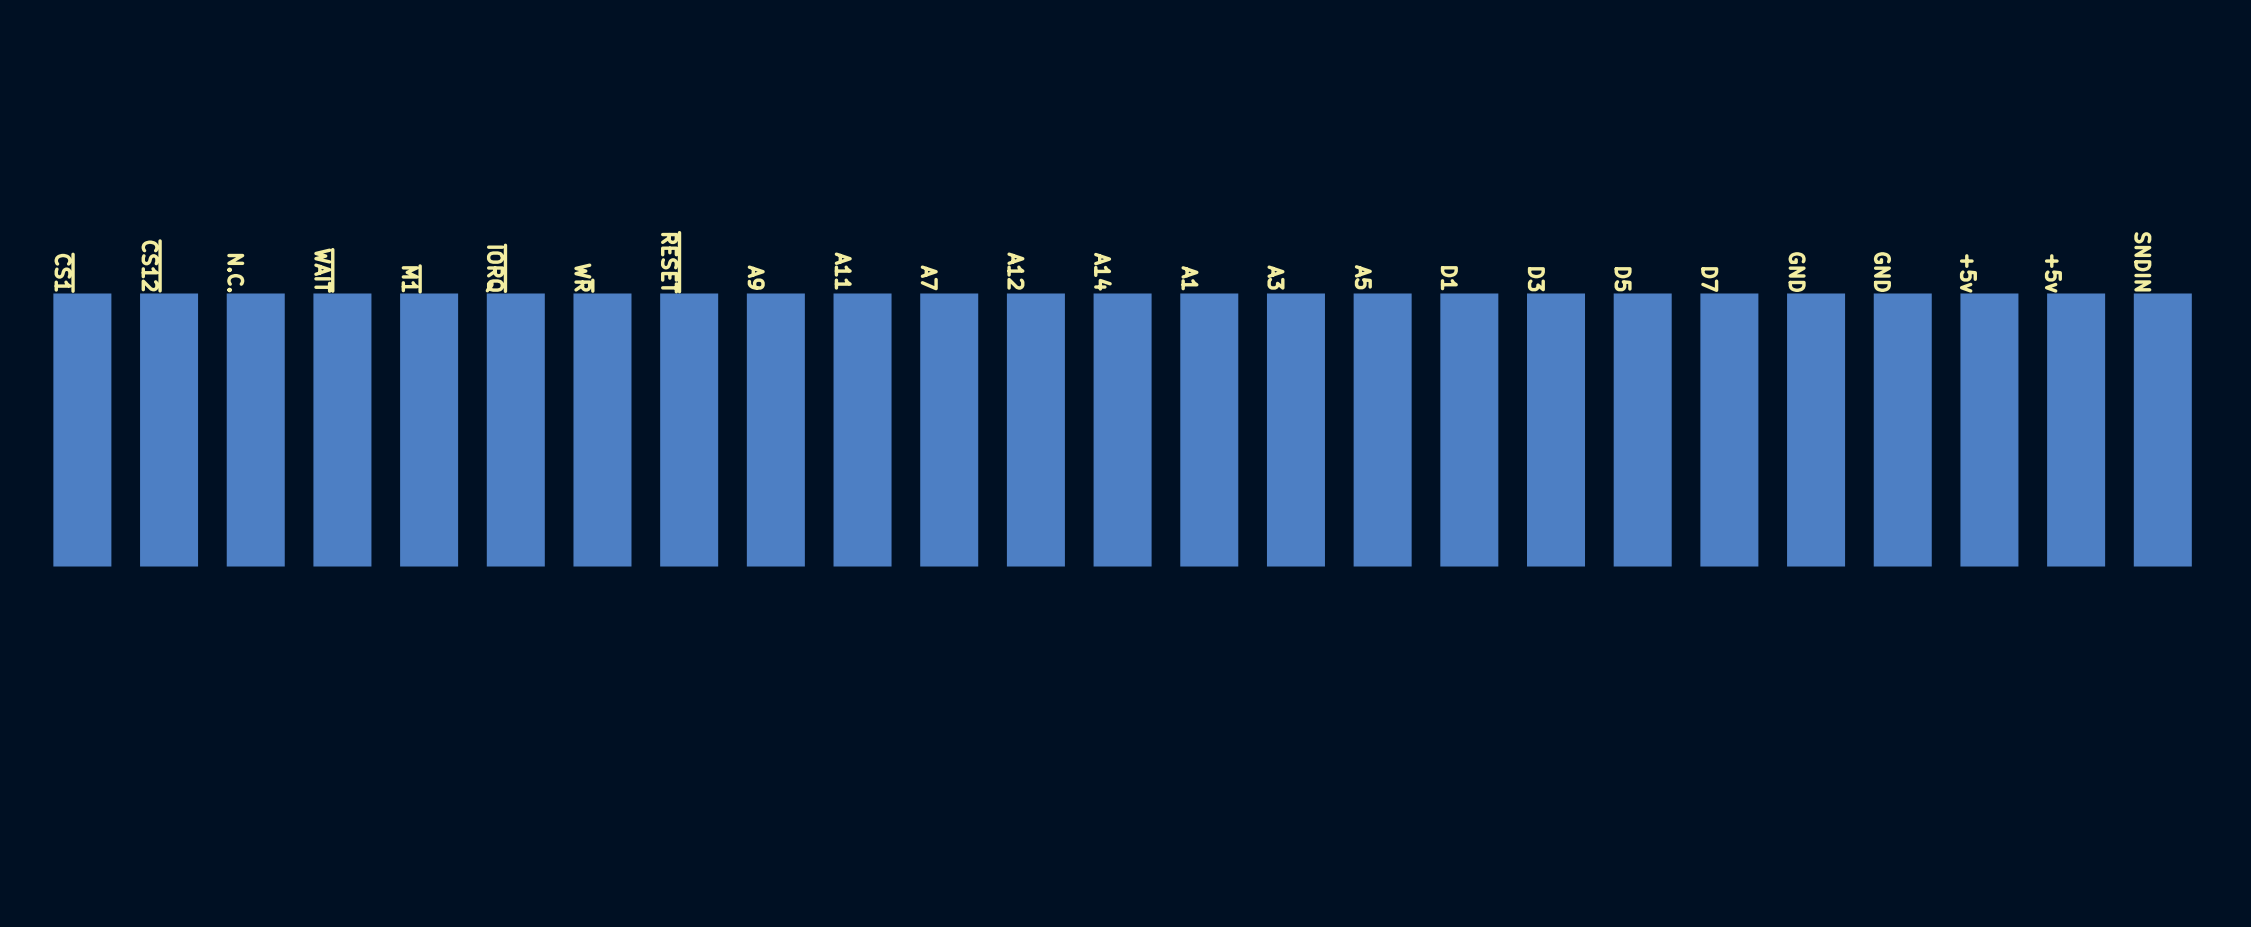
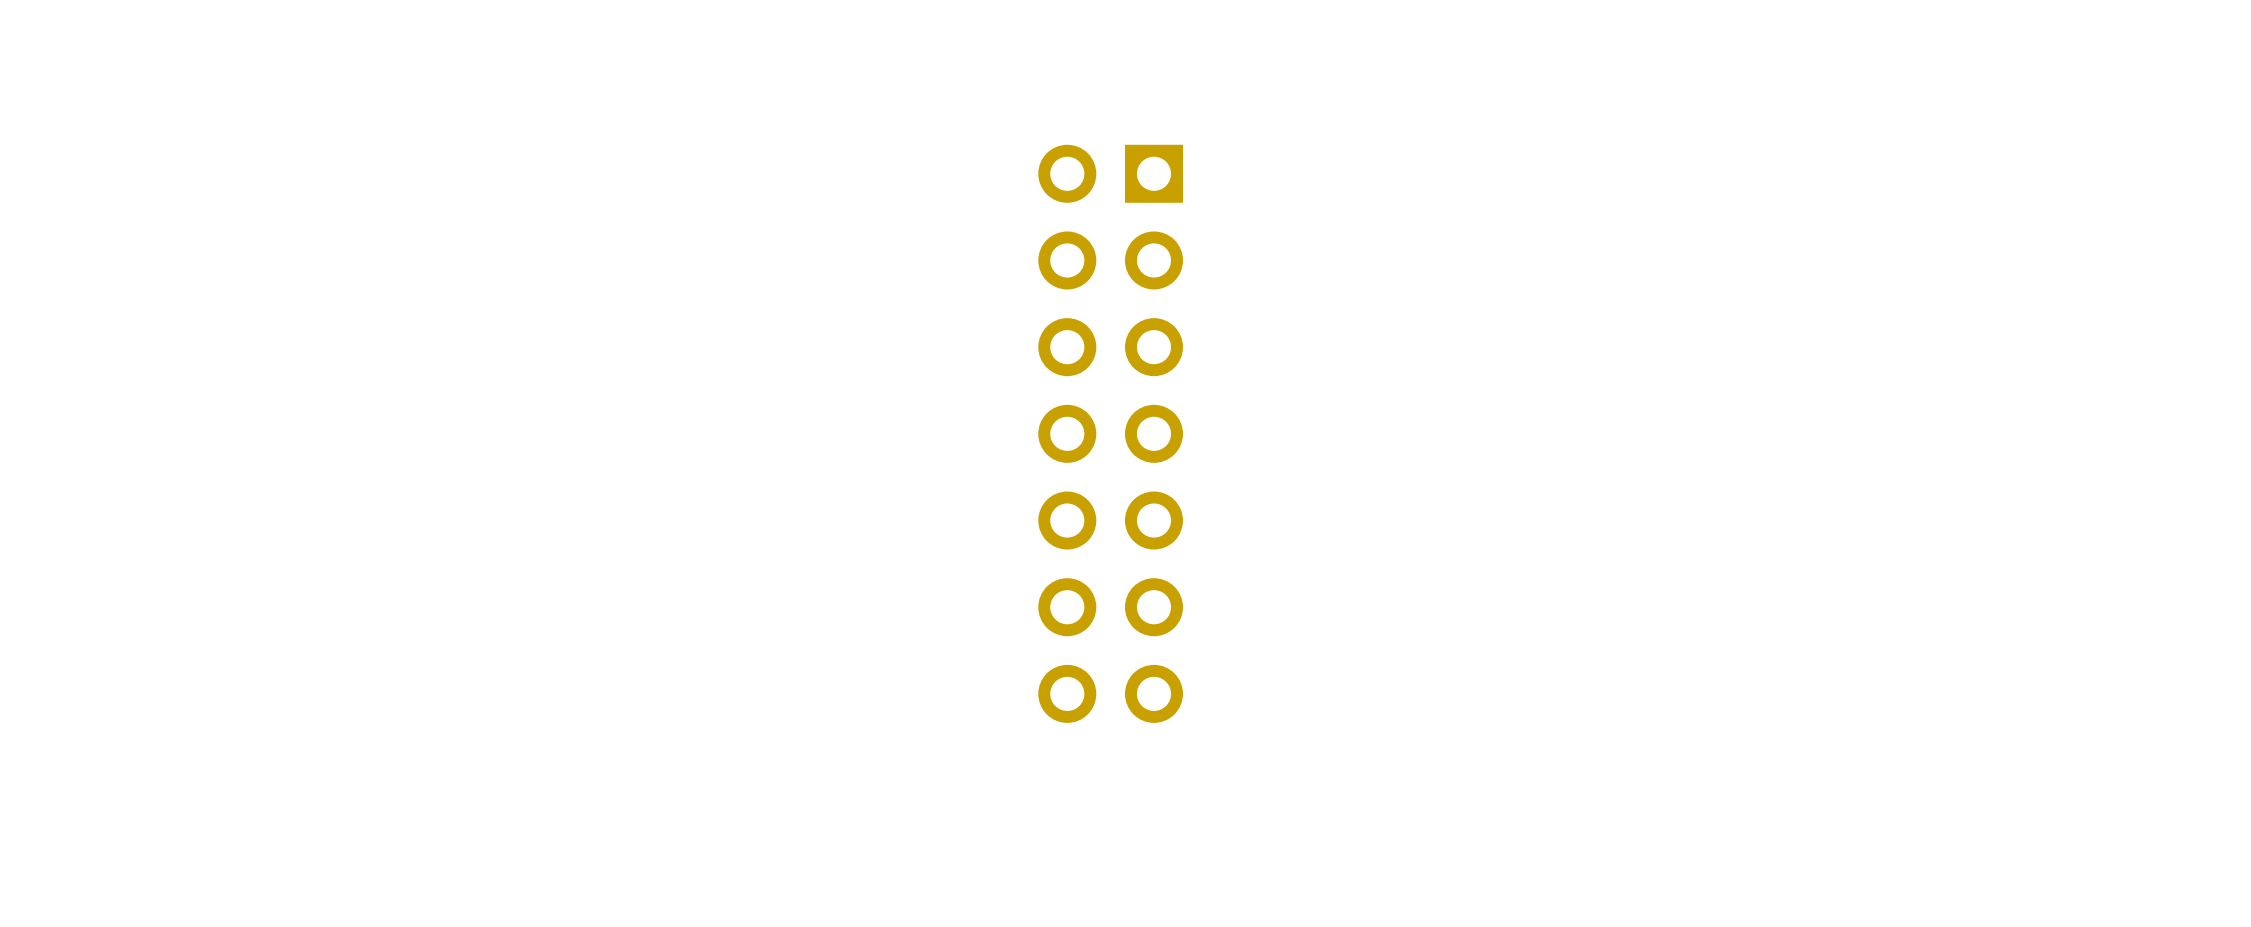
part footprint: [53, 293, 2192, 567] -> [1038, 144, 1183, 723]

